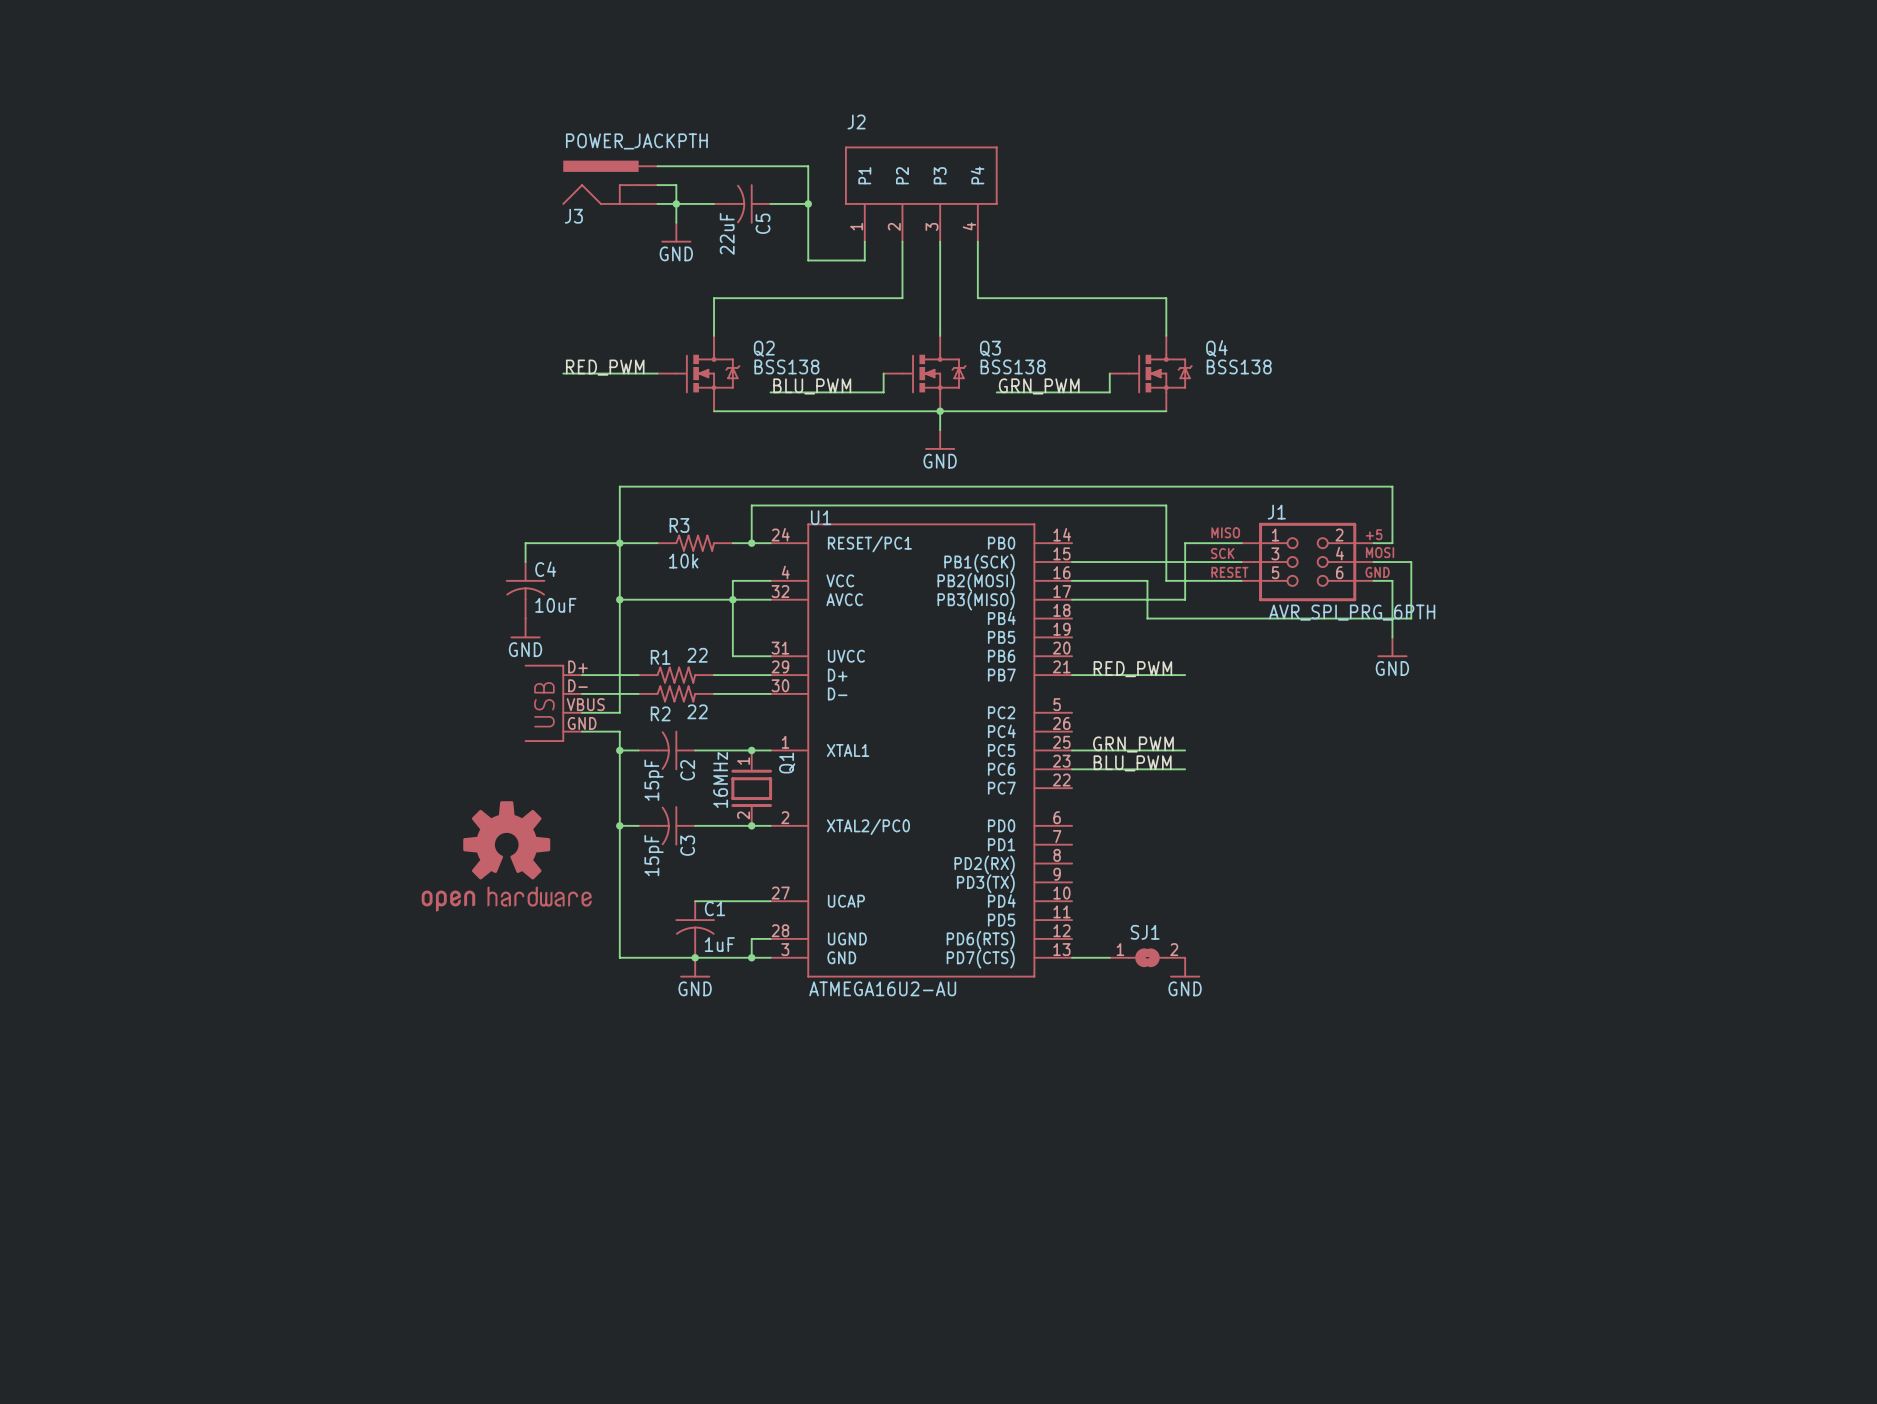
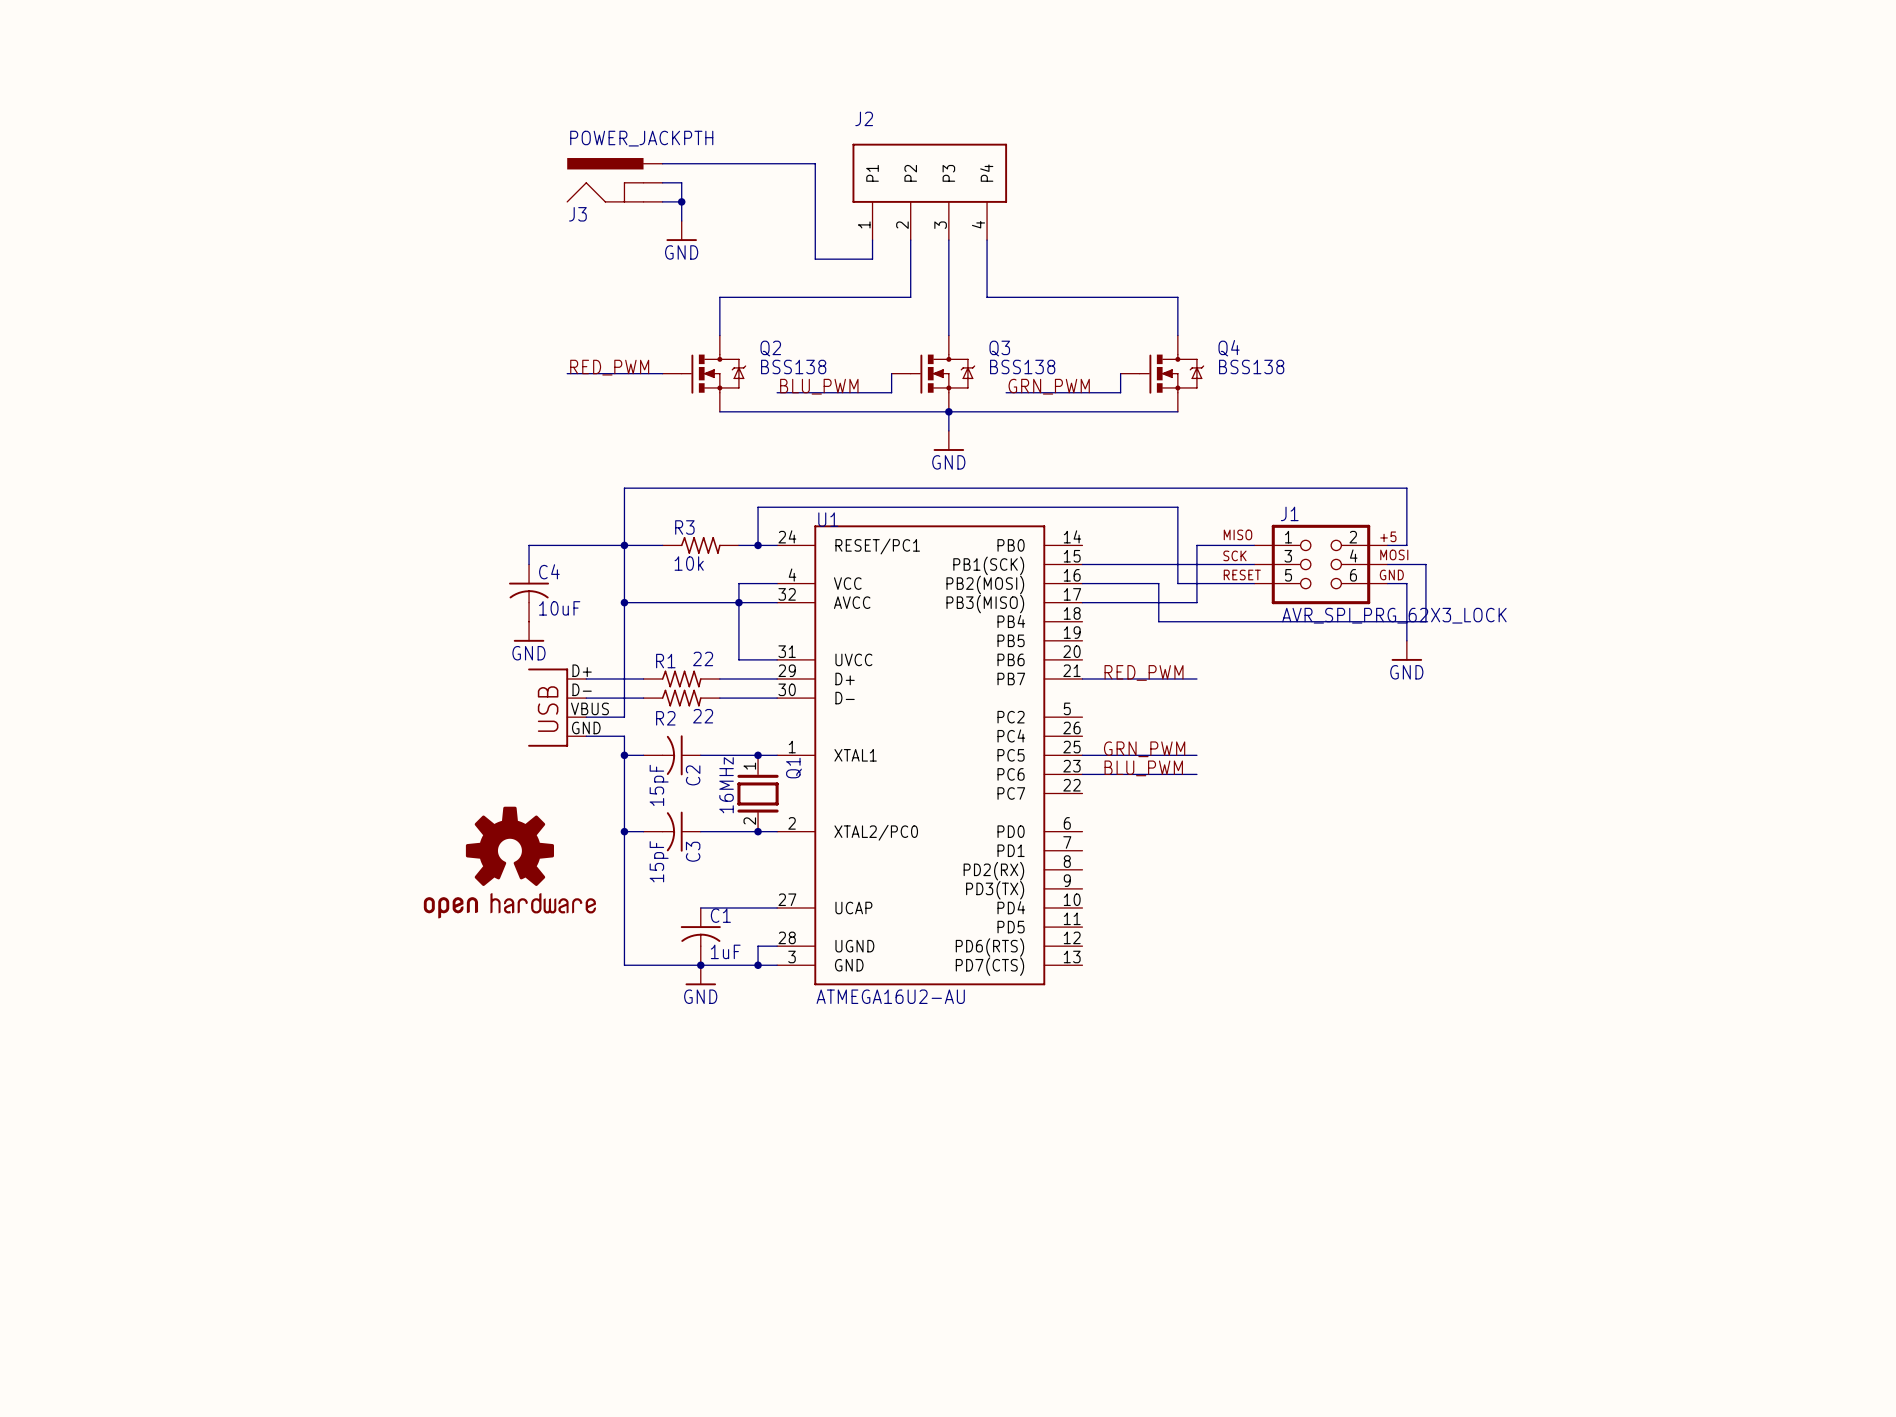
wire: (676, 203) (714, 203) -> none
C5: 22uF (742, 203) -> none
wire: (770, 203) (808, 203) -> none
junction: (808, 203) -> none
J1 value: AVR_SPI_PRG_6PTH (1352, 612) -> AVR_SPI_PRG_62X3_LOCK (1394, 615)
wire: (1072, 957) (1109, 957) -> none
SJ1: (1147, 957) -> none
power symbol: GND (1185, 967) -> none

